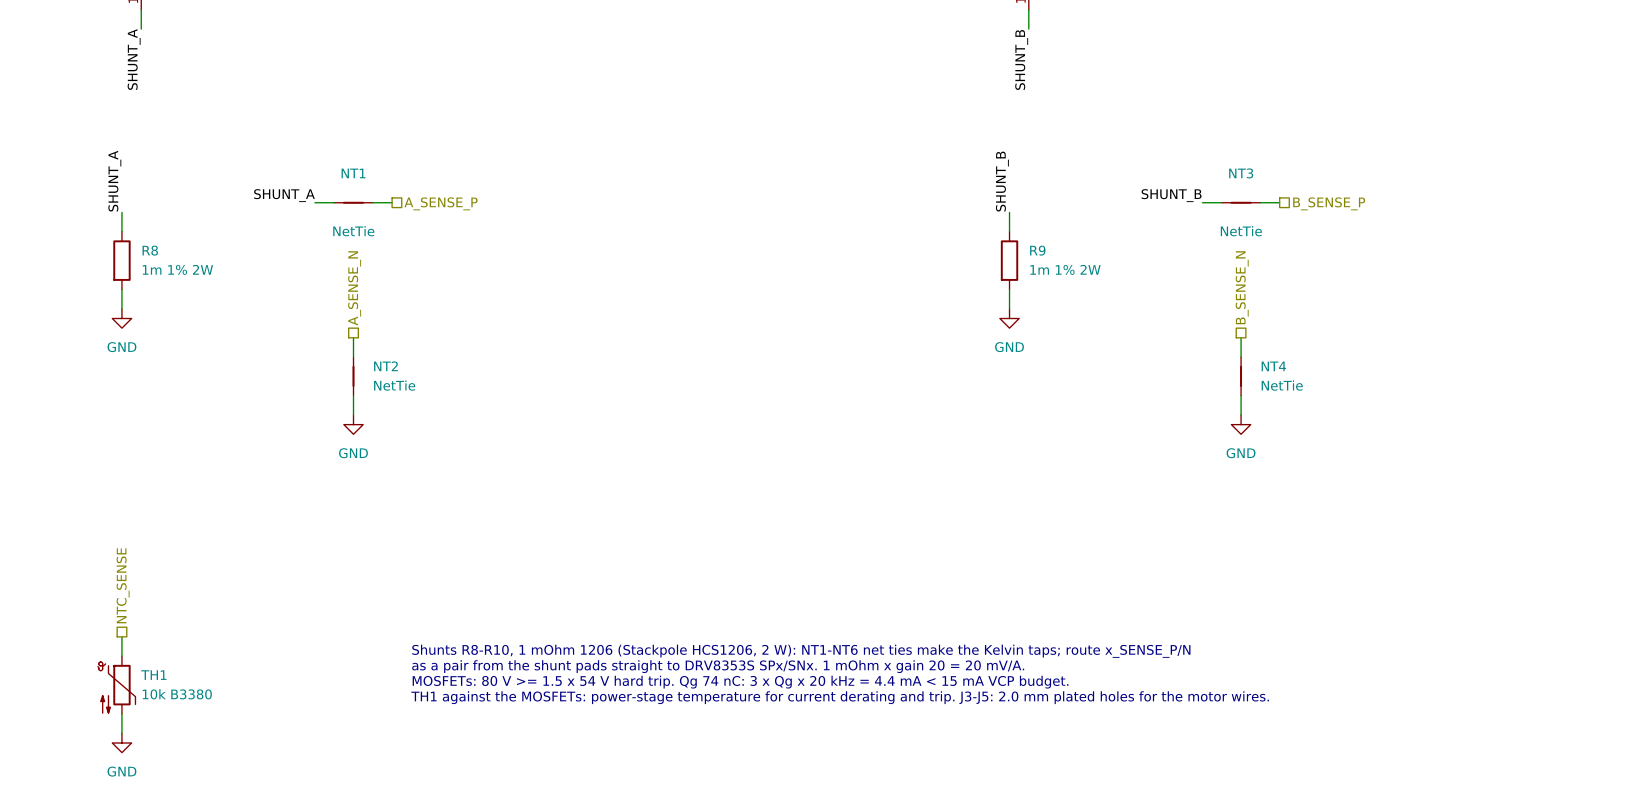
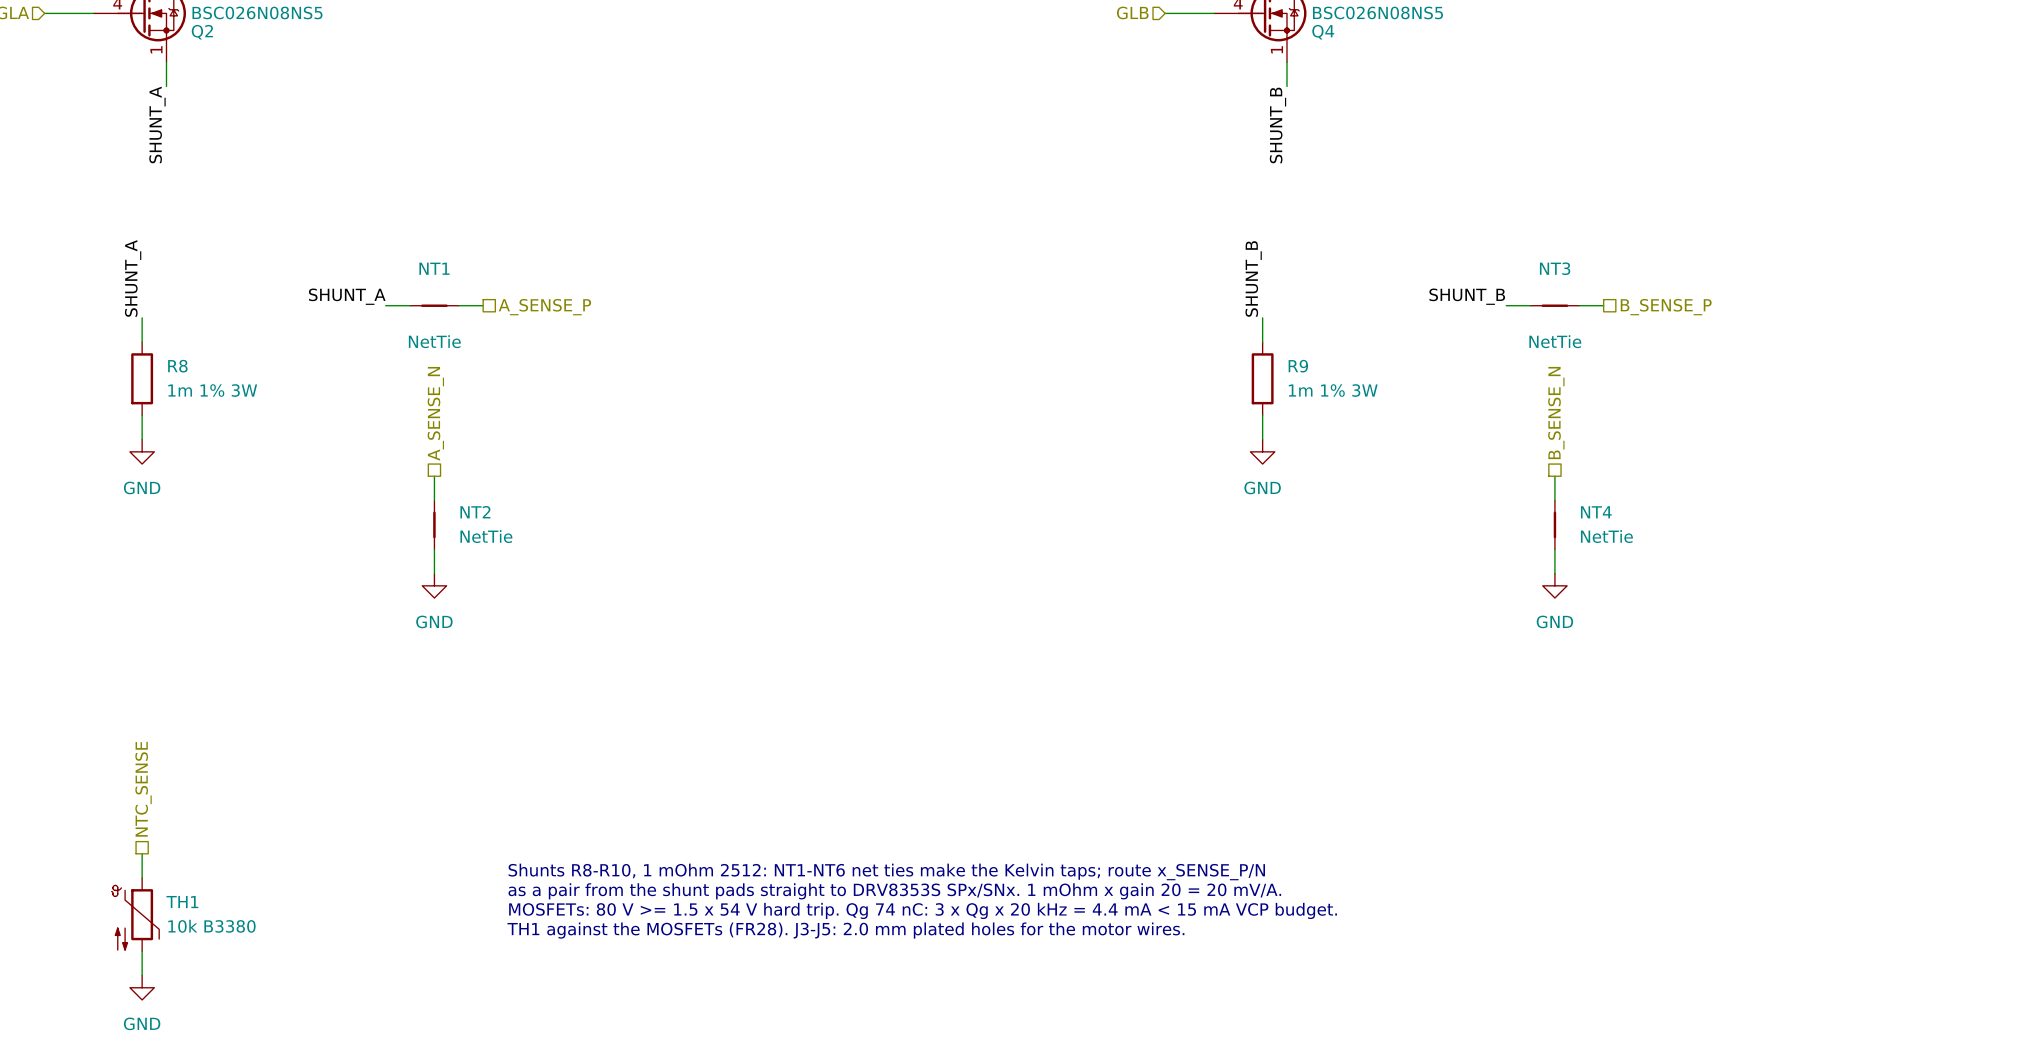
R8 value: 1m 1% 2W (177, 269) -> 1m 1% 3W (212, 390)
R9 value: 1m 1% 2W (1065, 269) -> 1m 1% 3W (1333, 390)
text: Shunts R8-R10, 1 mOhm 1206 (Stackpole HCS1206, 2 W): NT1-NT6 net ties make the Kelvin taps; route x_SENSE_P/N (801, 651) -> Shunts R8-R10, 1 mOhm 2512: NT1-NT6 net ties make the Kelvin taps; route x_SENSE_P/N (886, 871)
text: TH1 against the MOSFETs: power-stage temperature for current derating and trip. J3-J5: 2.0 mm plated holes for the motor wires. (840, 697) -> TH1 against the MOSFETs (FR28). J3-J5: 2.0 mm plated holes for the motor wires. (845, 930)

